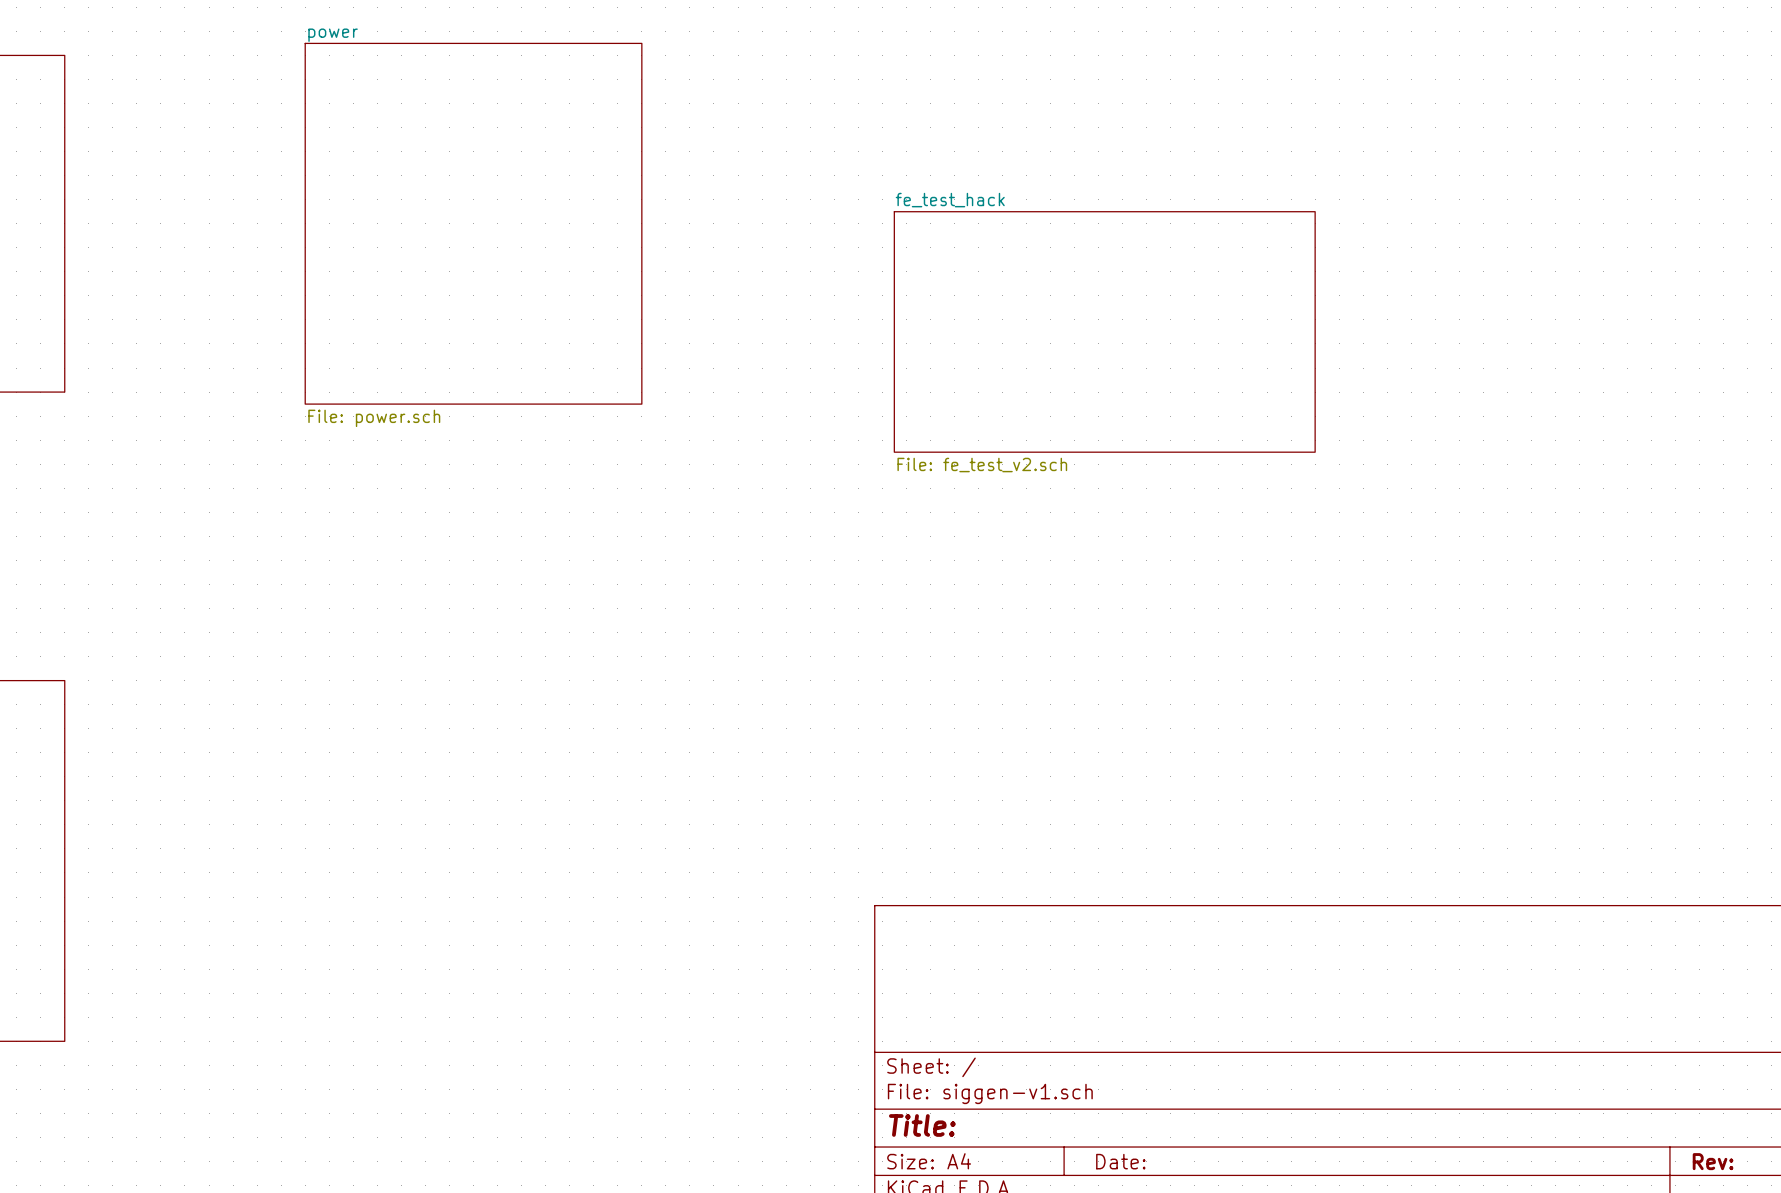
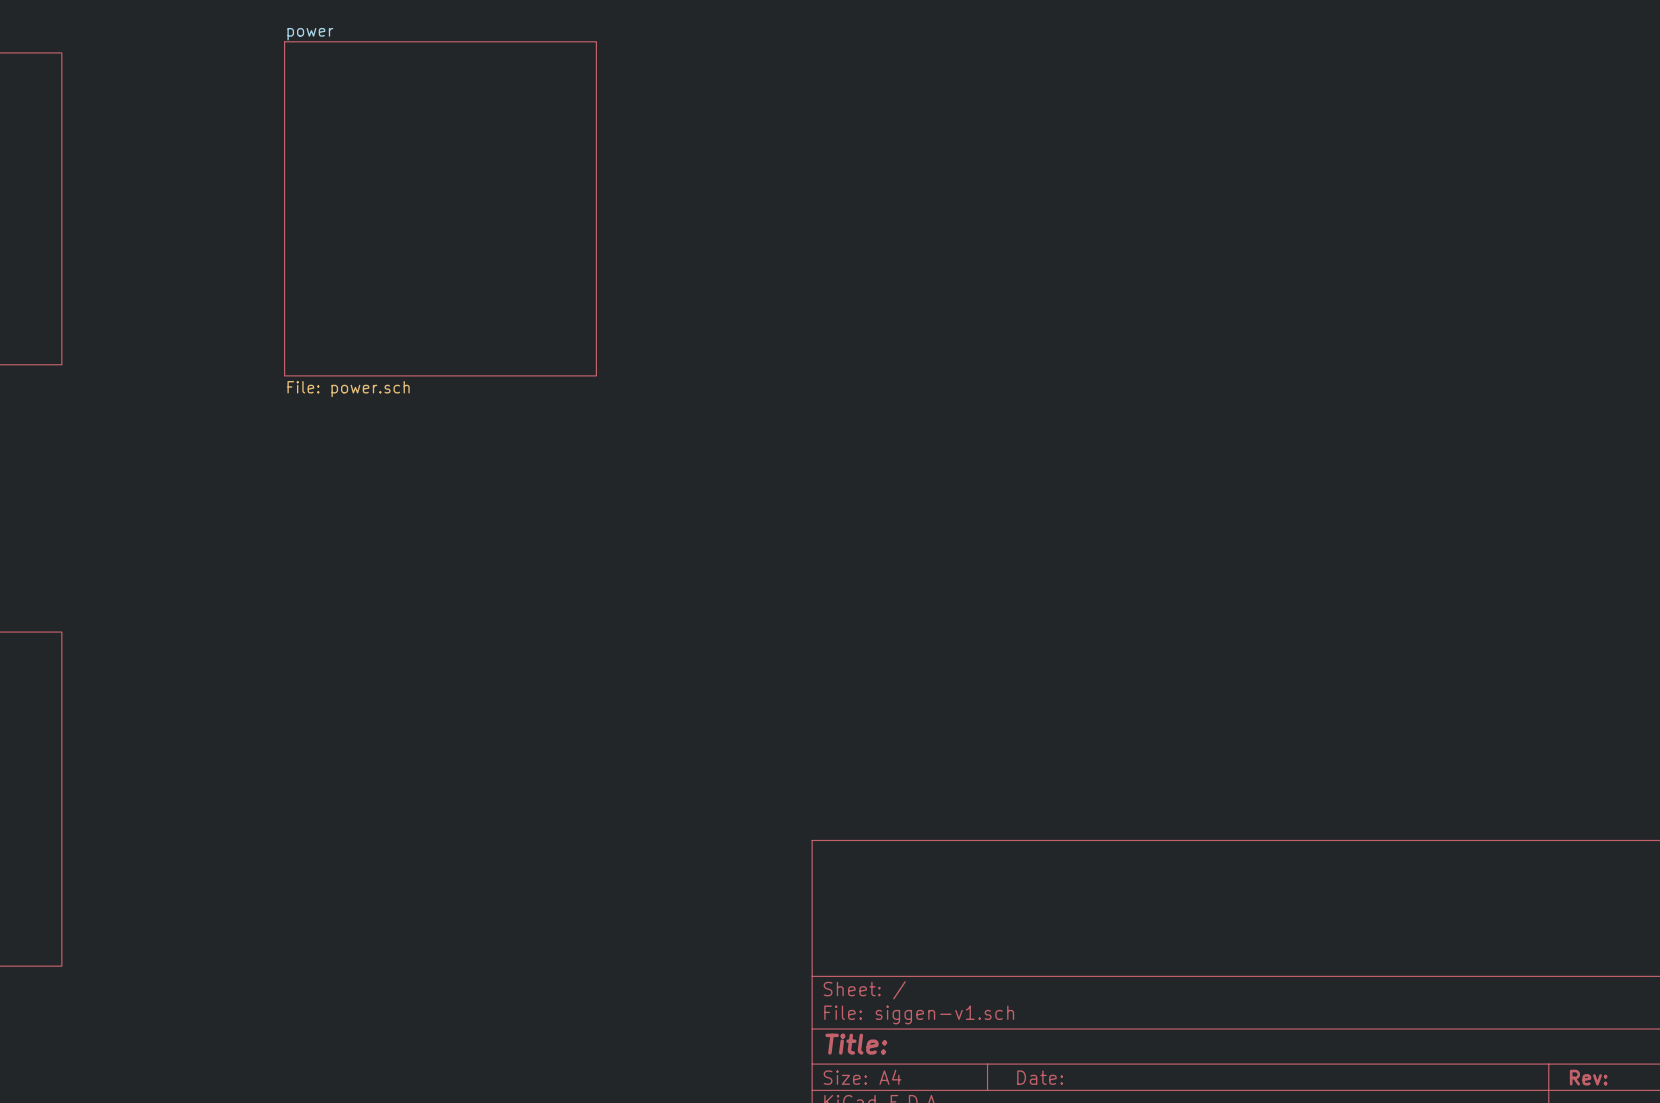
sheet fe_test_hack: File: fe_test_v2.sch (1104, 331) -> none

